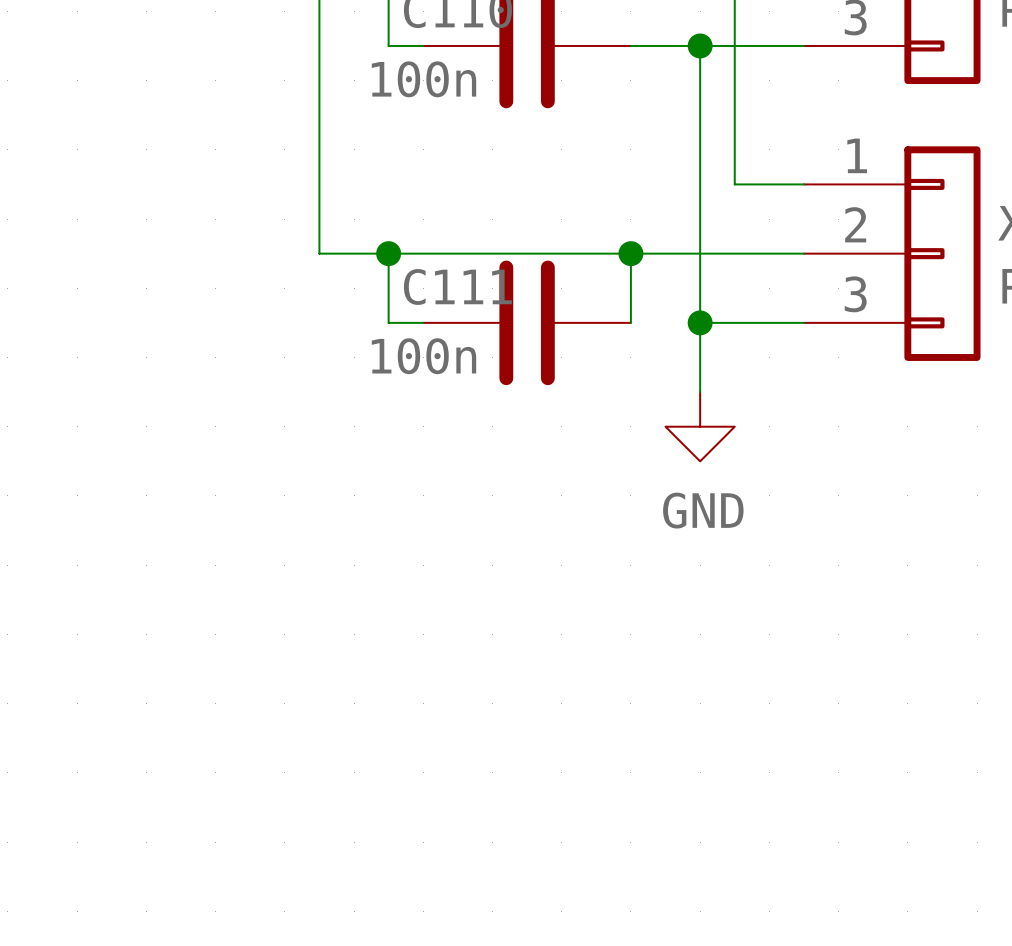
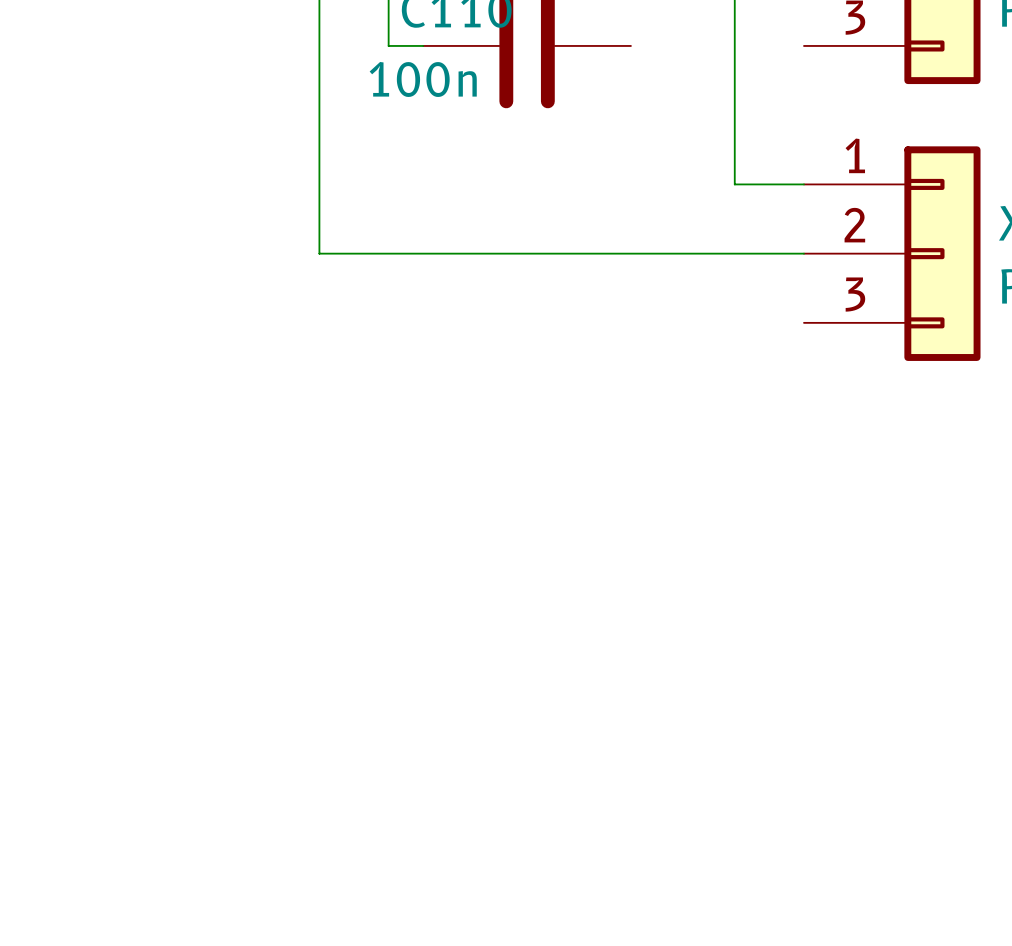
wire: (630, 45) (803, 45) -> none
wire: (700, 45) (700, 392) -> none
junction: (700, 45) -> none
wire: (388, 253) (388, 322) (423, 322) -> none
junction: (388, 253) -> none
wire: (630, 253) (630, 322) -> none
junction: (630, 253) -> none
C111: 100n (527, 322) -> none
wire: (700, 322) (803, 322) -> none
junction: (700, 322) -> none
power symbol: GND (700, 426) -> none

